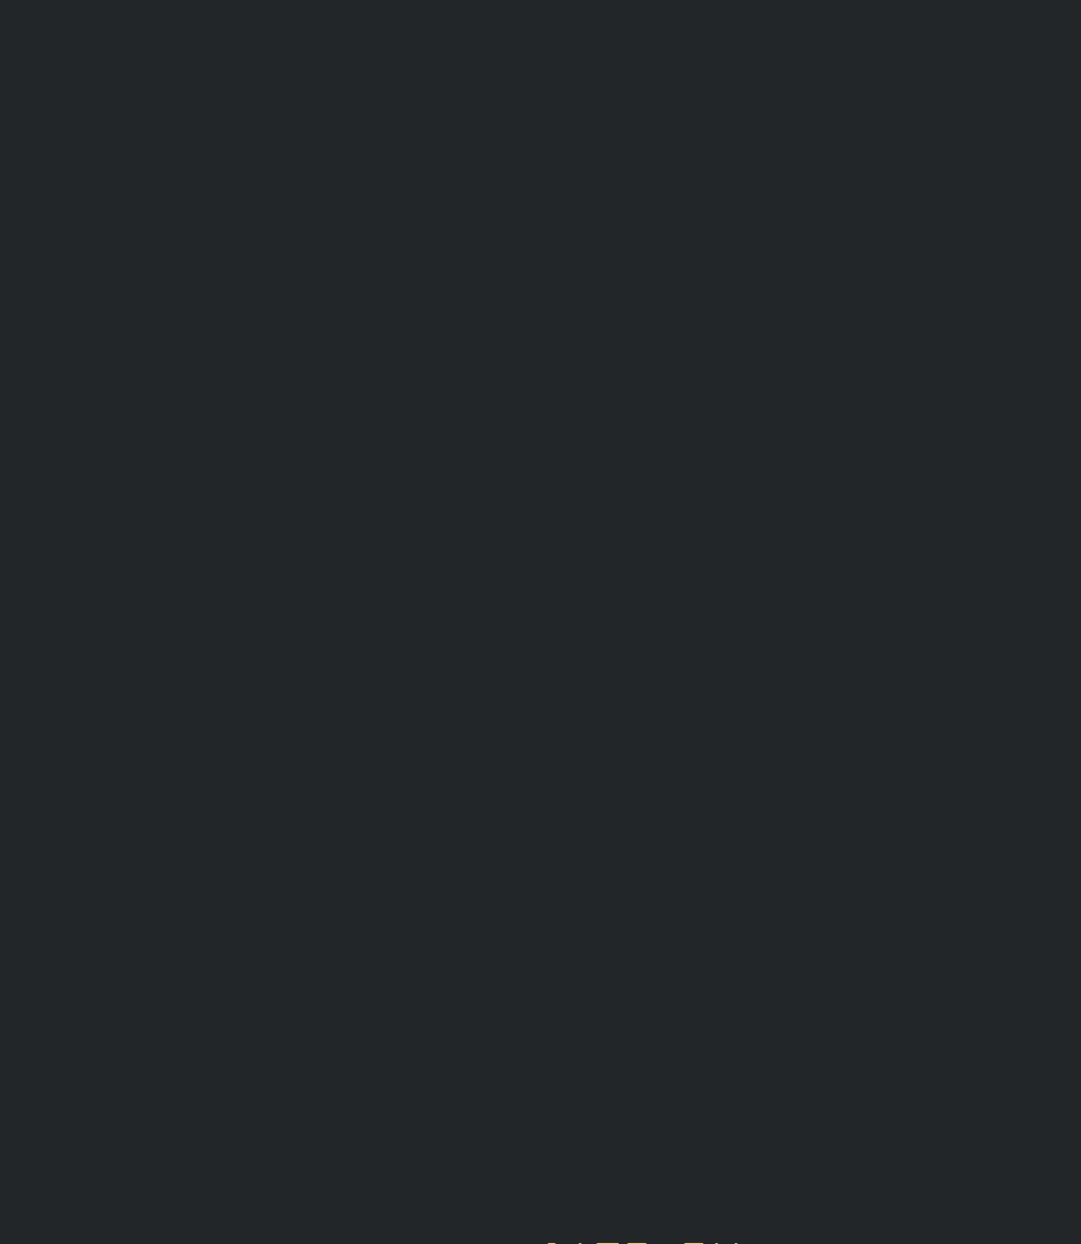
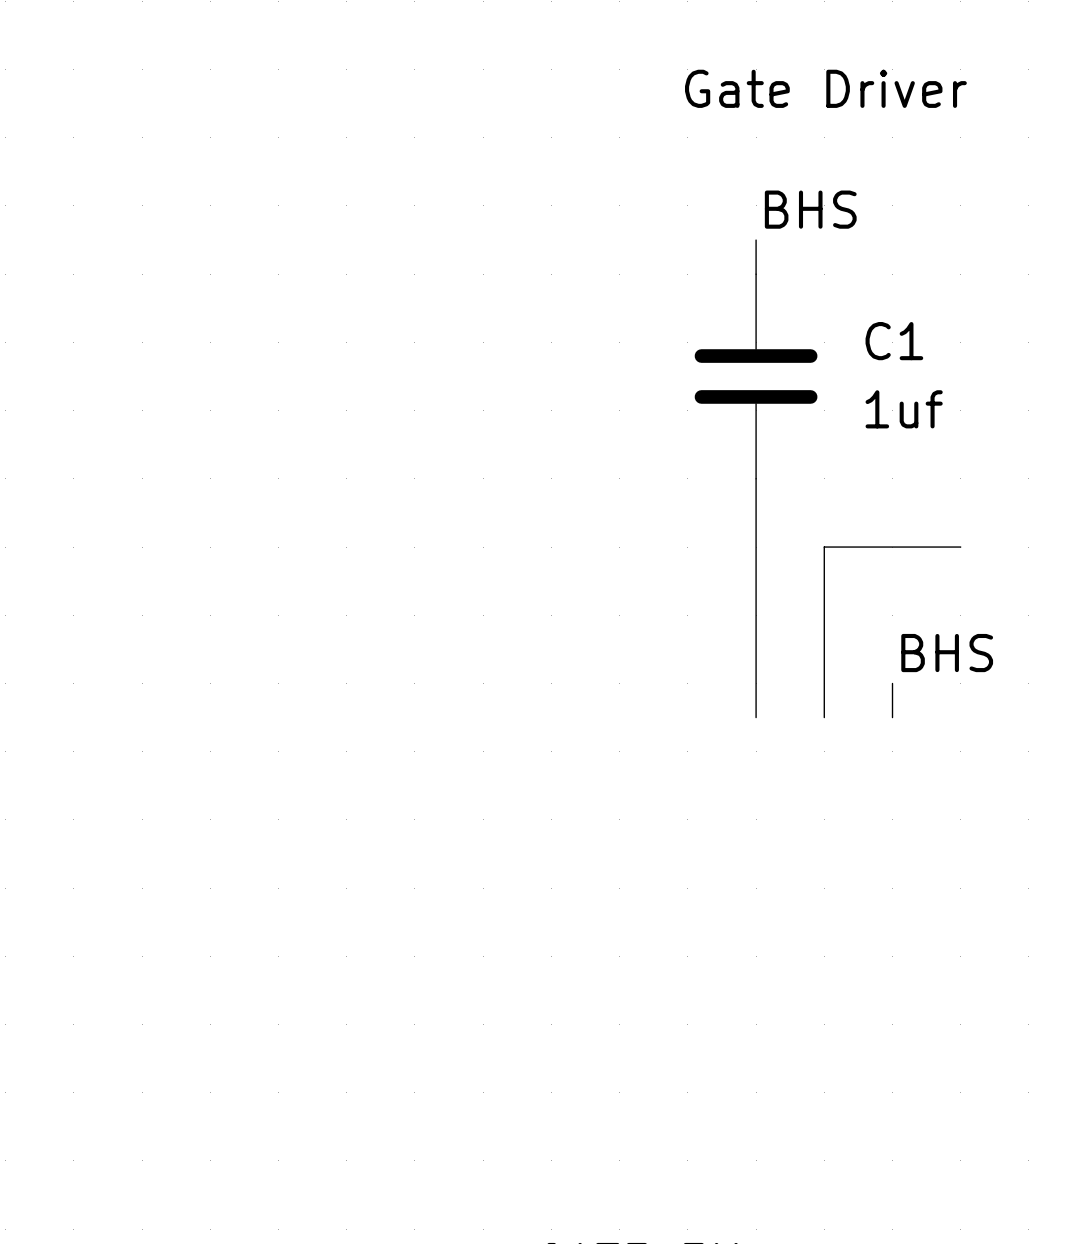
text: none -> Gate Driver (825, 88)
label: none -> BHS (810, 209)
wire: none -> (756, 240) (756, 274)
C1: none -> 1uf (756, 376)
wire: none -> (756, 478) (756, 717)
wire: none -> (960, 547) (824, 547) (824, 717)
label: none -> BHS (947, 653)
wire: none -> (892, 683) (892, 717)

